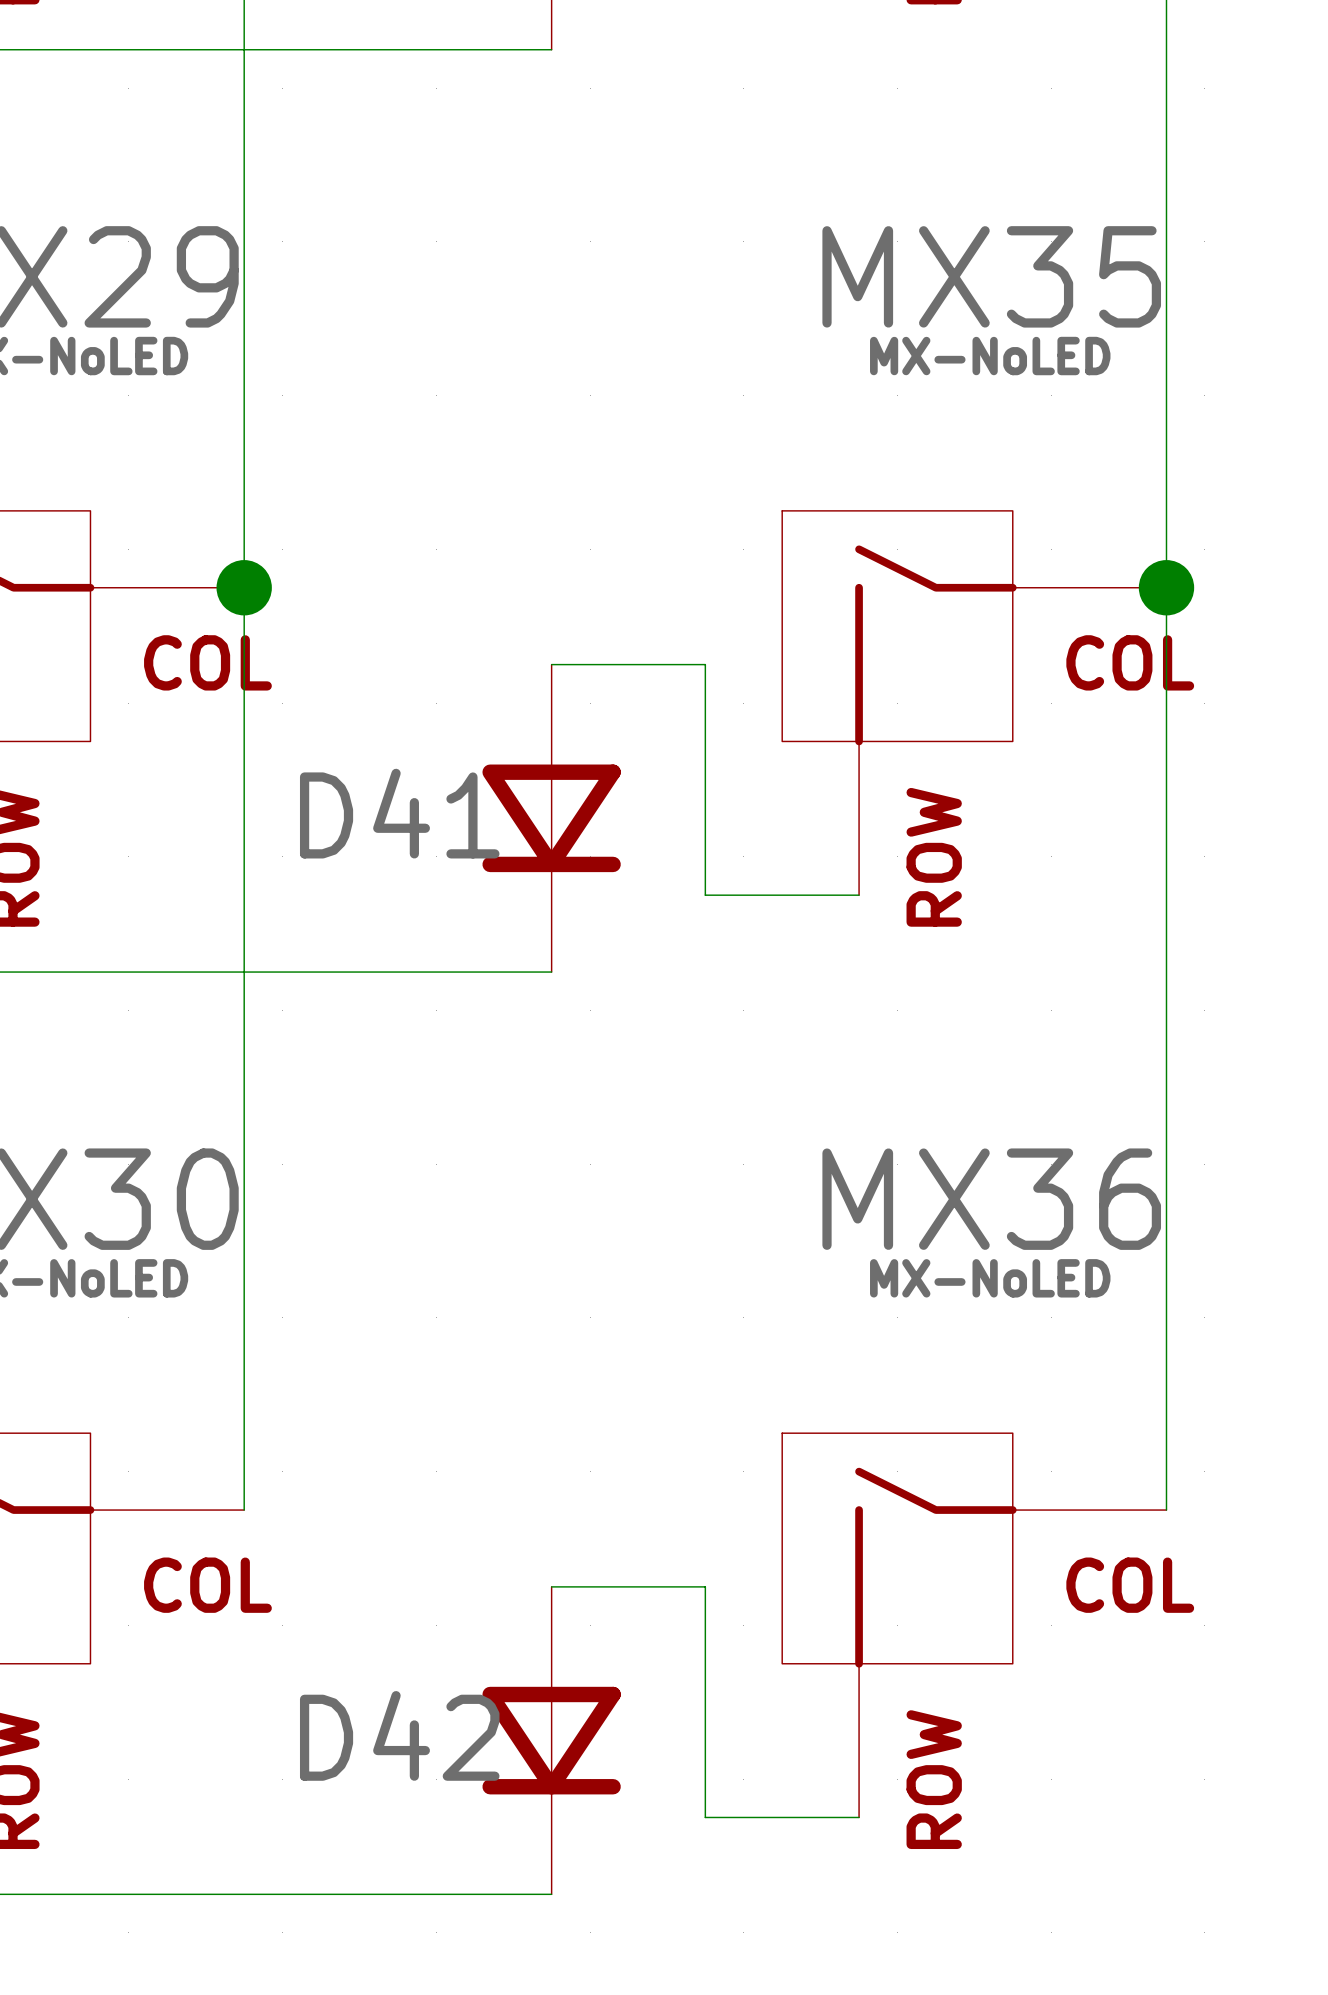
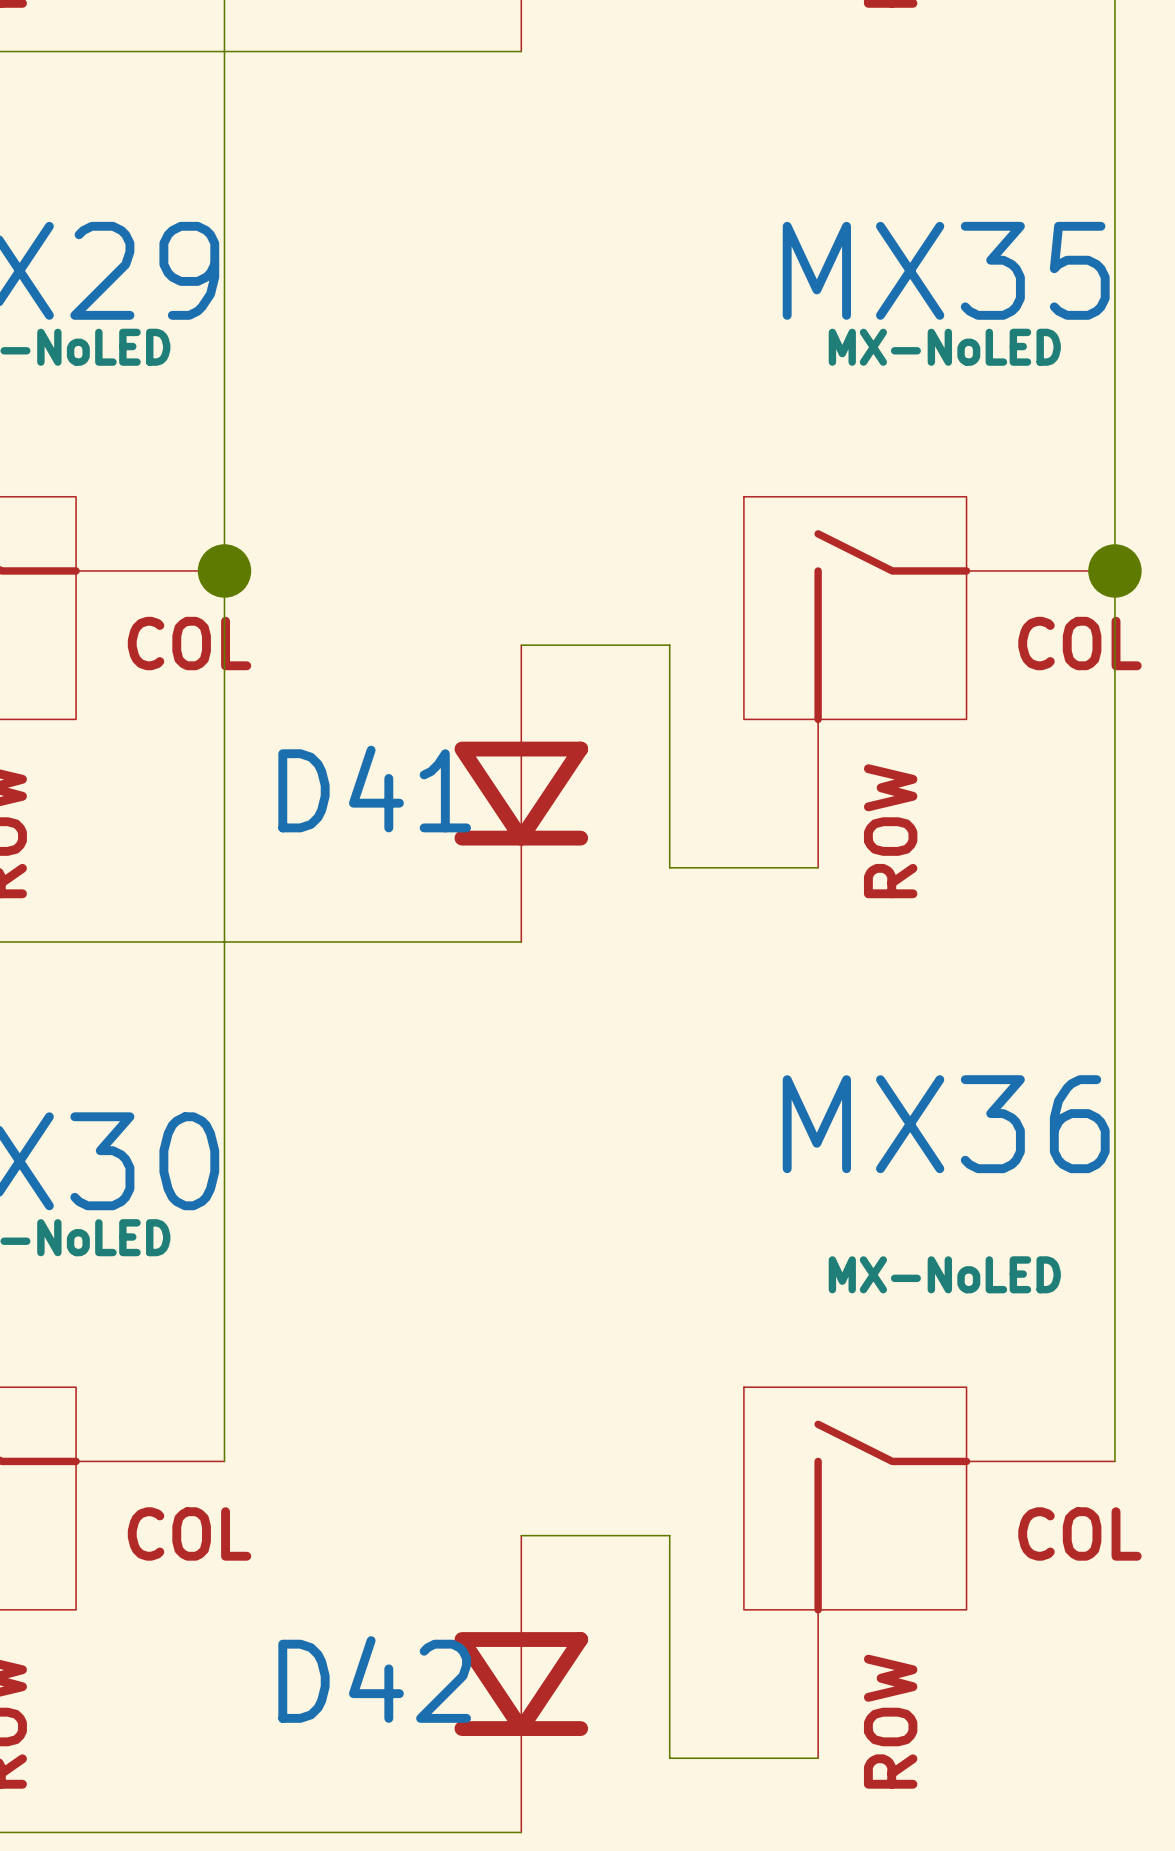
MX36 name position: MX36 (991, 1199) -> MX36 (946, 1124)
MX36 value position: MX-NoLED (990, 1278) -> MX-NoLED (944, 1274)

